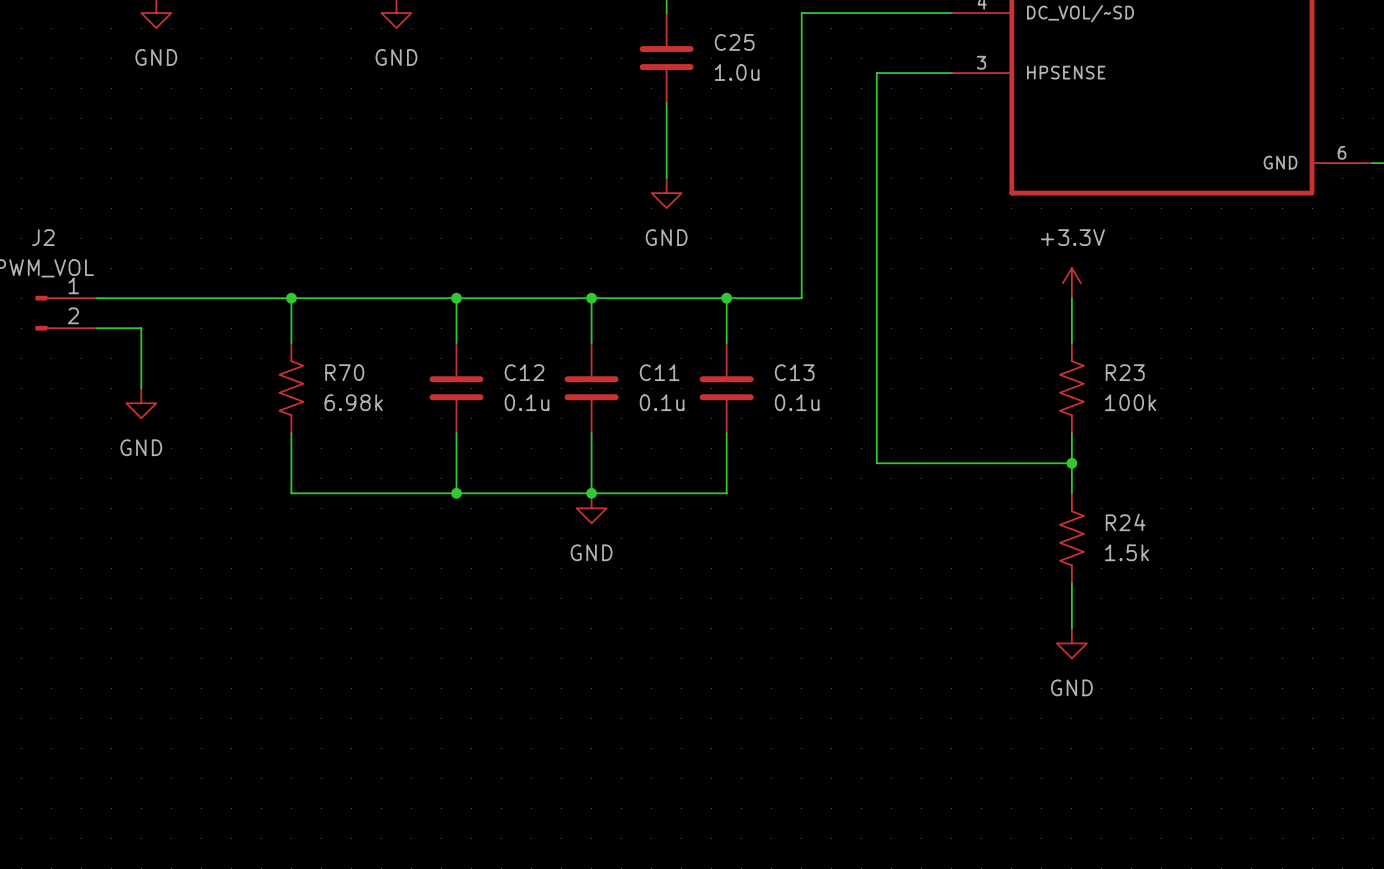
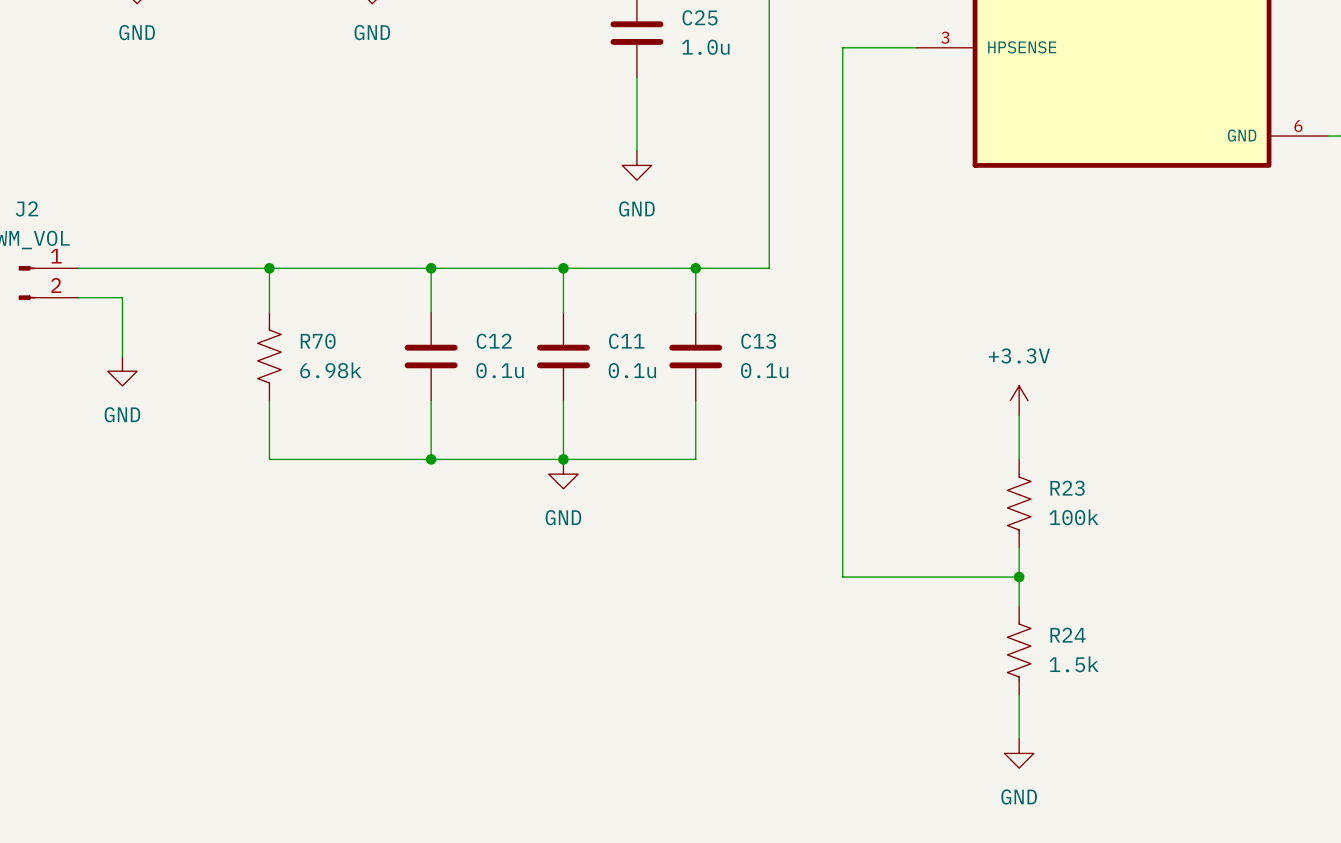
power symbol position: +3.3V (1071, 283) -> +3.3V (1019, 400)
wire: (1071, 298) (1071, 343) -> none
R23 position: (1071, 388) -> (1019, 503)
wire: (1071, 433) (1071, 493) -> (1019, 547) (1019, 606)
wire: (876, 463) (1071, 463) -> (842, 430) (842, 577) (1019, 577)
junction: (1071, 463) -> none
R24 position: (1071, 538) -> (1019, 650)
wire: (1071, 583) (1071, 628) -> (1019, 415) (1019, 459)
junction: none -> (1019, 577)
power symbol position: GND (1071, 643) -> GND (1019, 753)
wire: none -> (1019, 694) (1019, 738)

